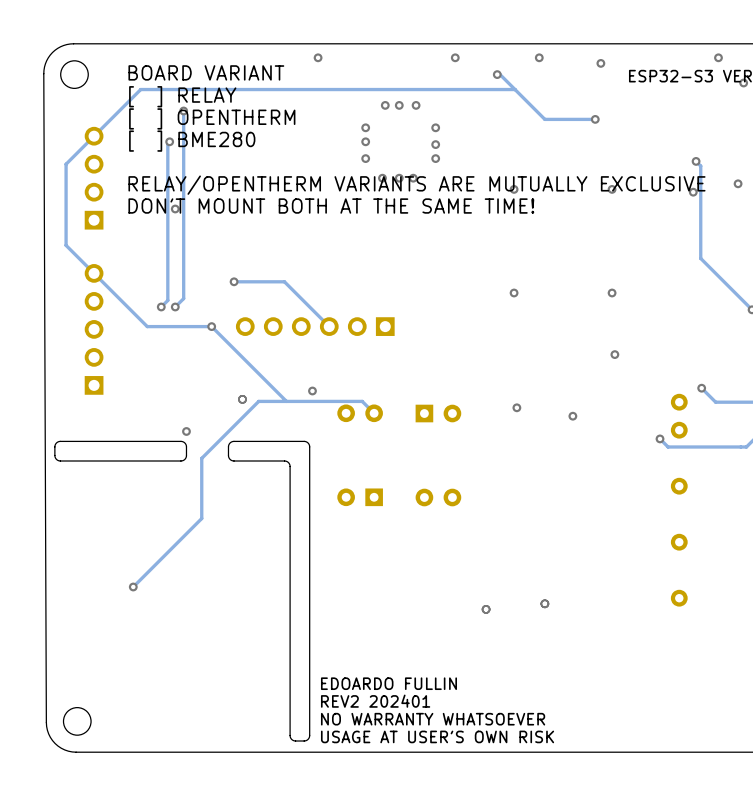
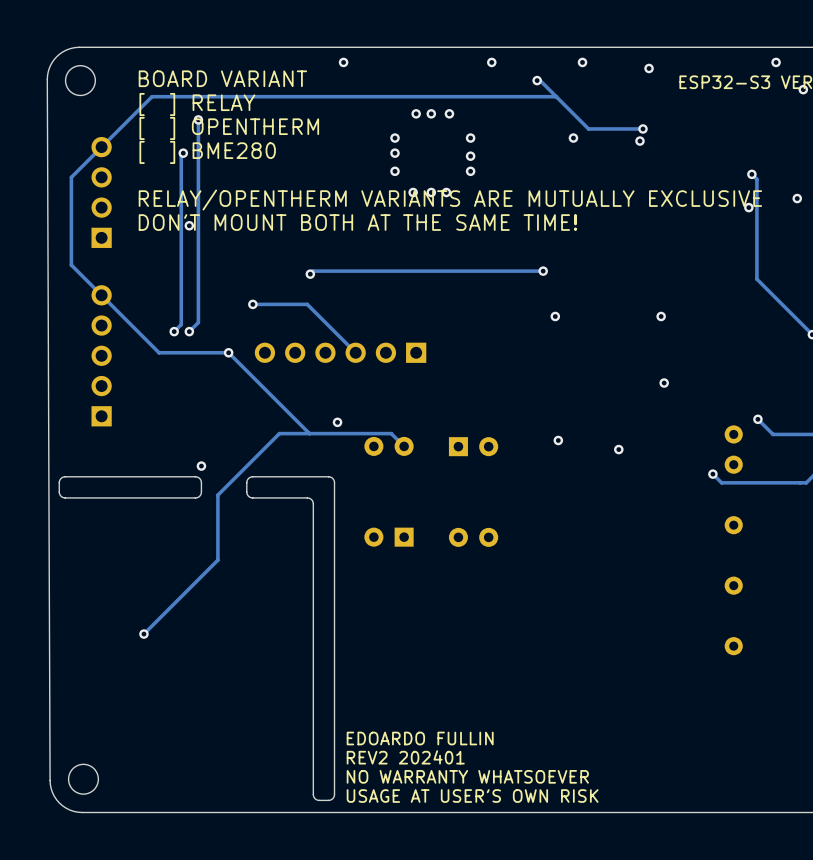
via: none -> (573, 138)
via: none -> (639, 141)
via: (514, 189) -> none
via: (612, 189) -> none
track: none -> (543, 271) (313, 271) (310, 274)
via: none -> (543, 271)
via: none -> (310, 274)
via: (242, 399) -> none
via: (544, 603) -> none
via: (486, 609) -> none

